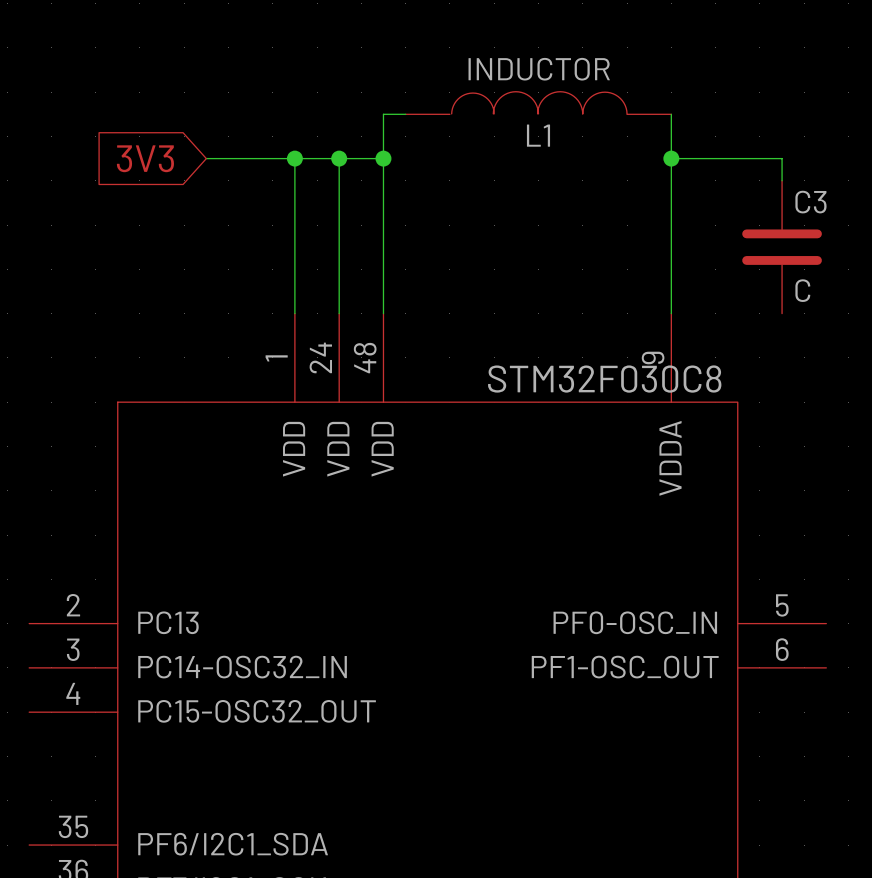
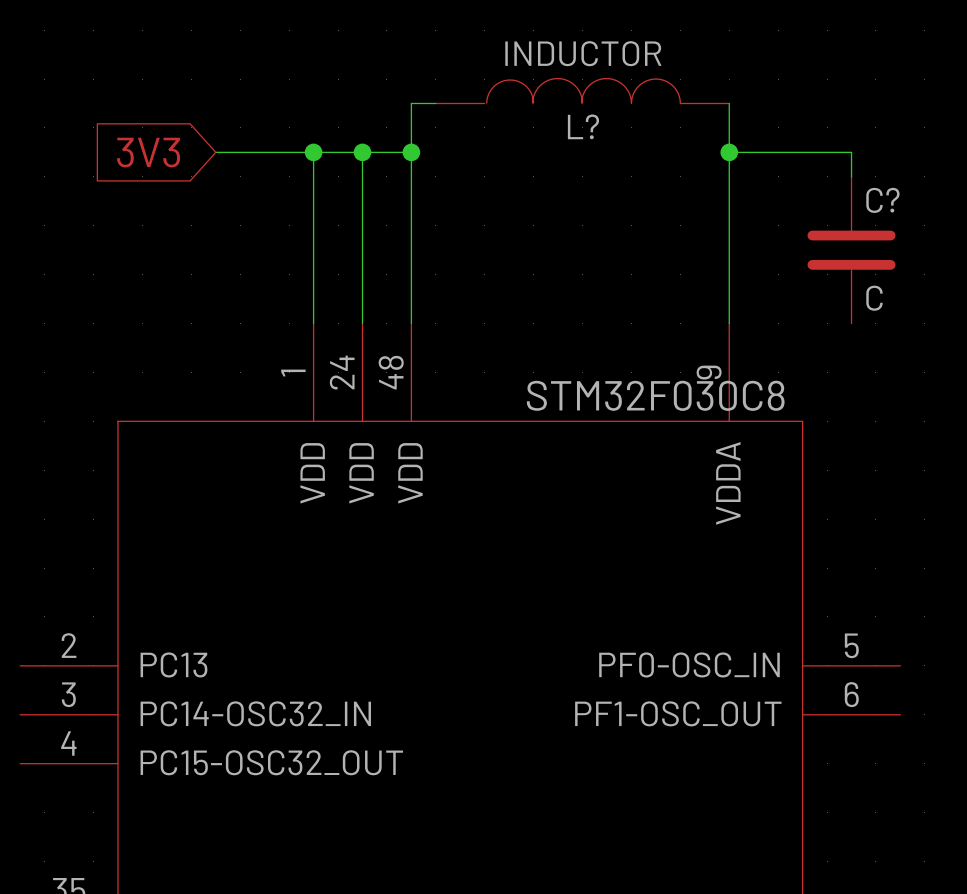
L1 name: L1 (538, 135) -> L? (583, 126)
C3 name: C3 (810, 202) -> C? (882, 200)

